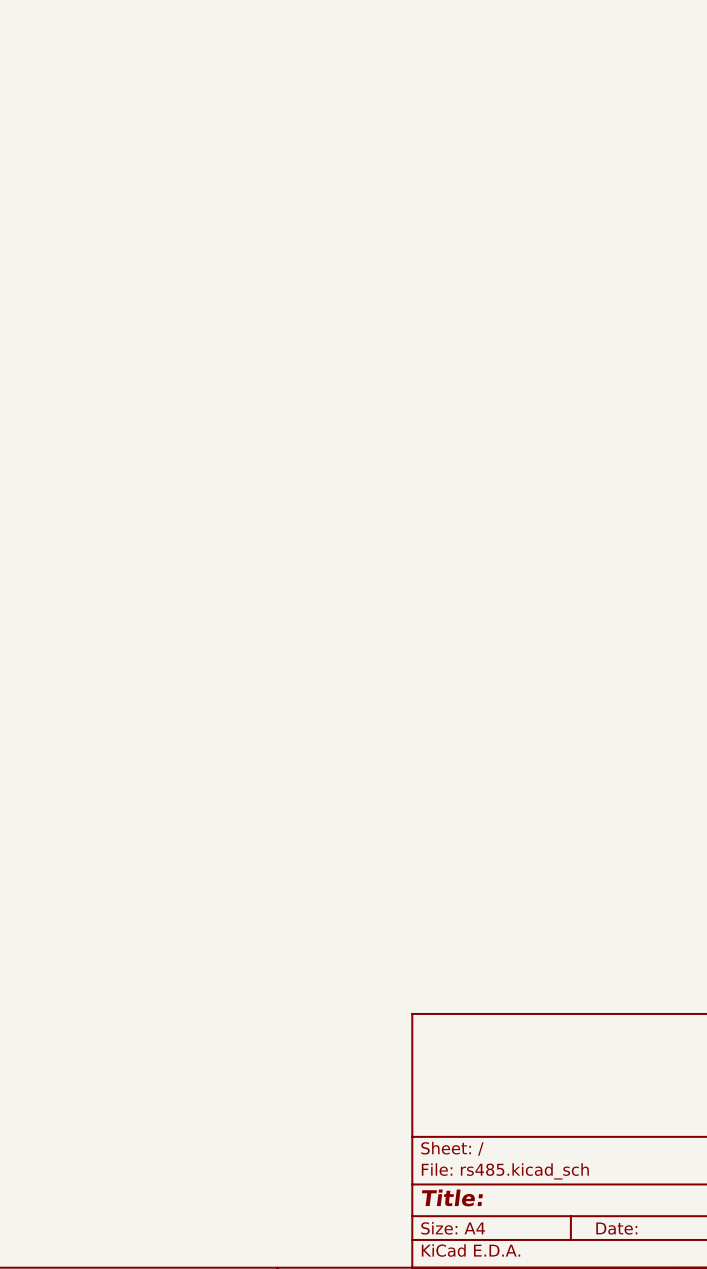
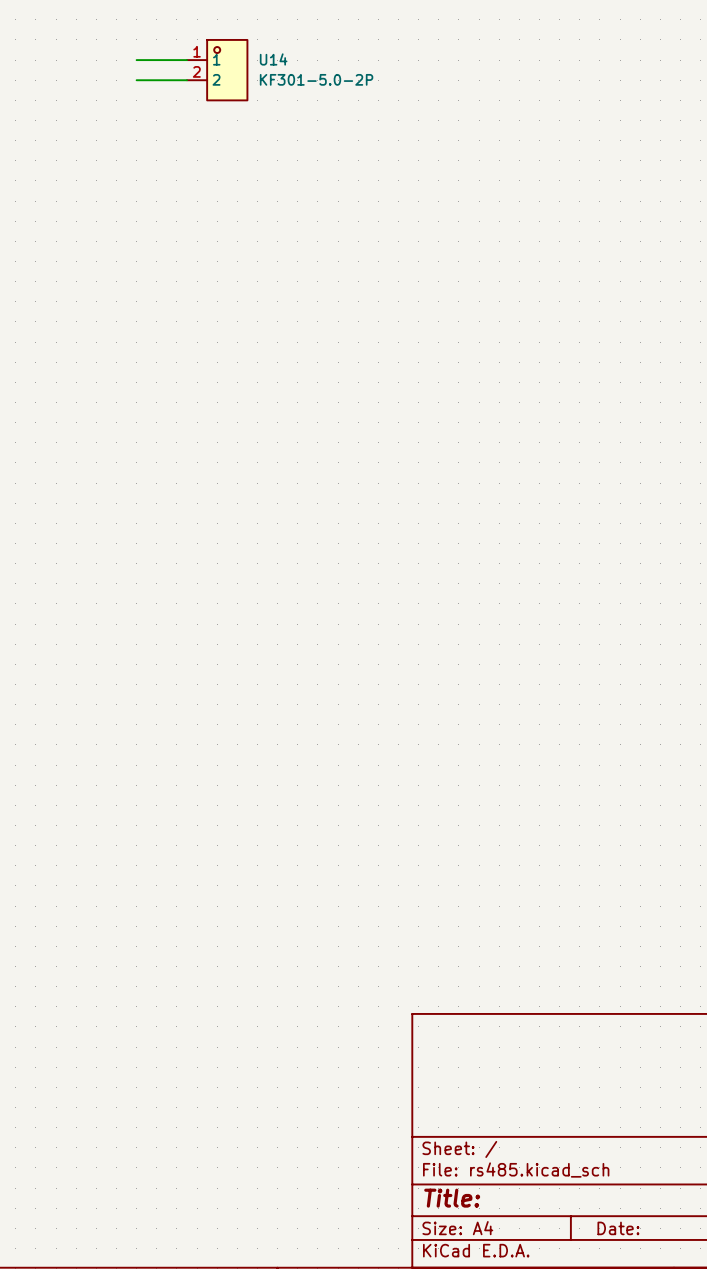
wire: none -> (136, 60) (186, 60)
U14: none -> KF301-5.0-2P (217, 70)
wire: none -> (136, 80) (186, 80)

